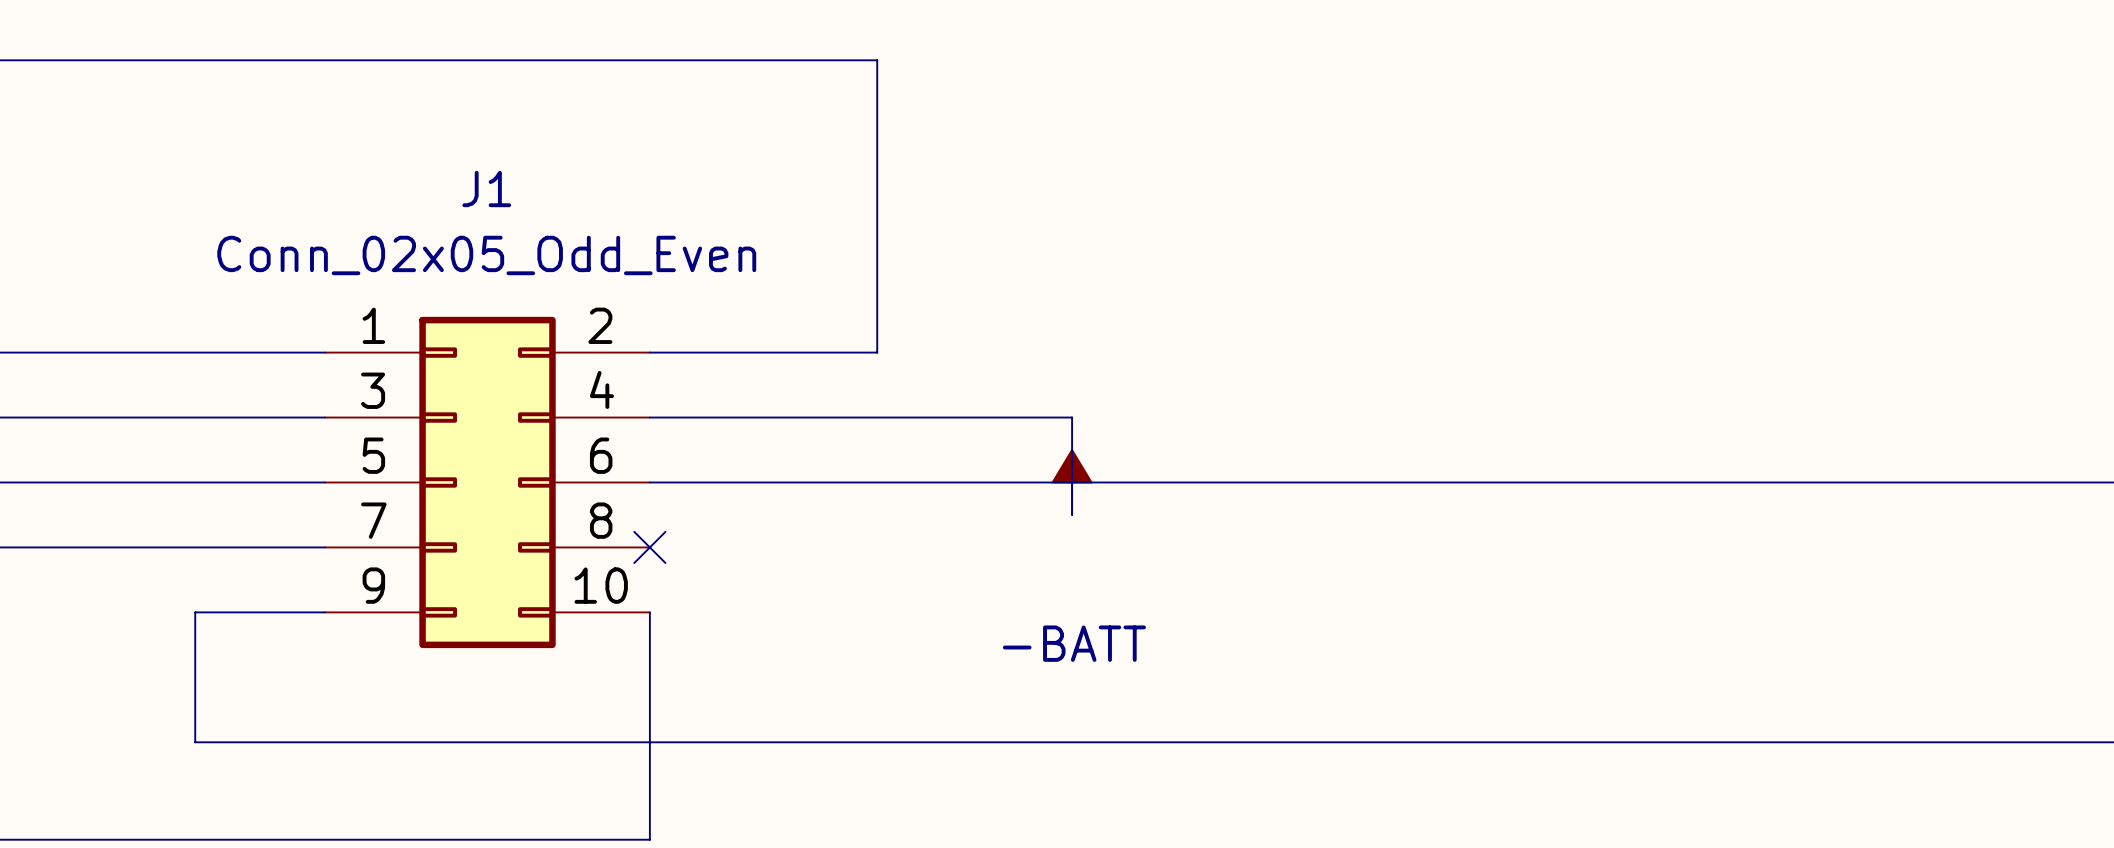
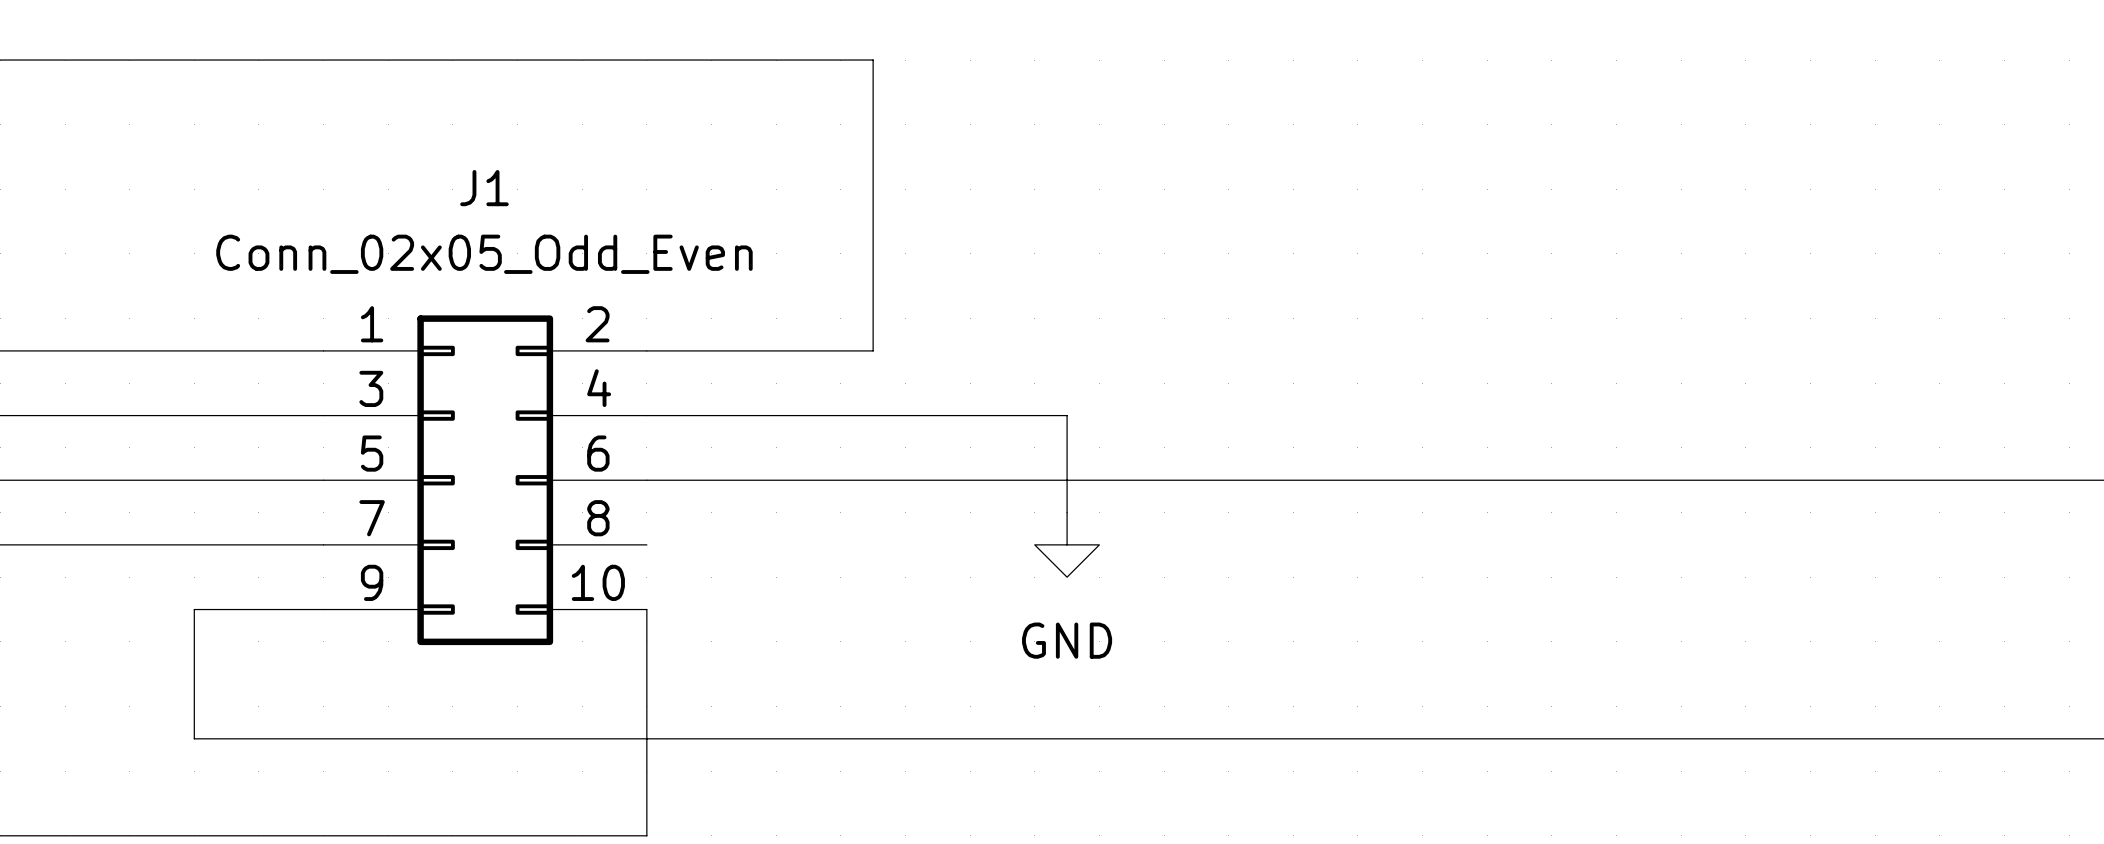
power symbol: -BATT (1072, 482) -> none
no-connect mark: (649, 547) -> none
power symbol: none -> GND (1067, 544)

